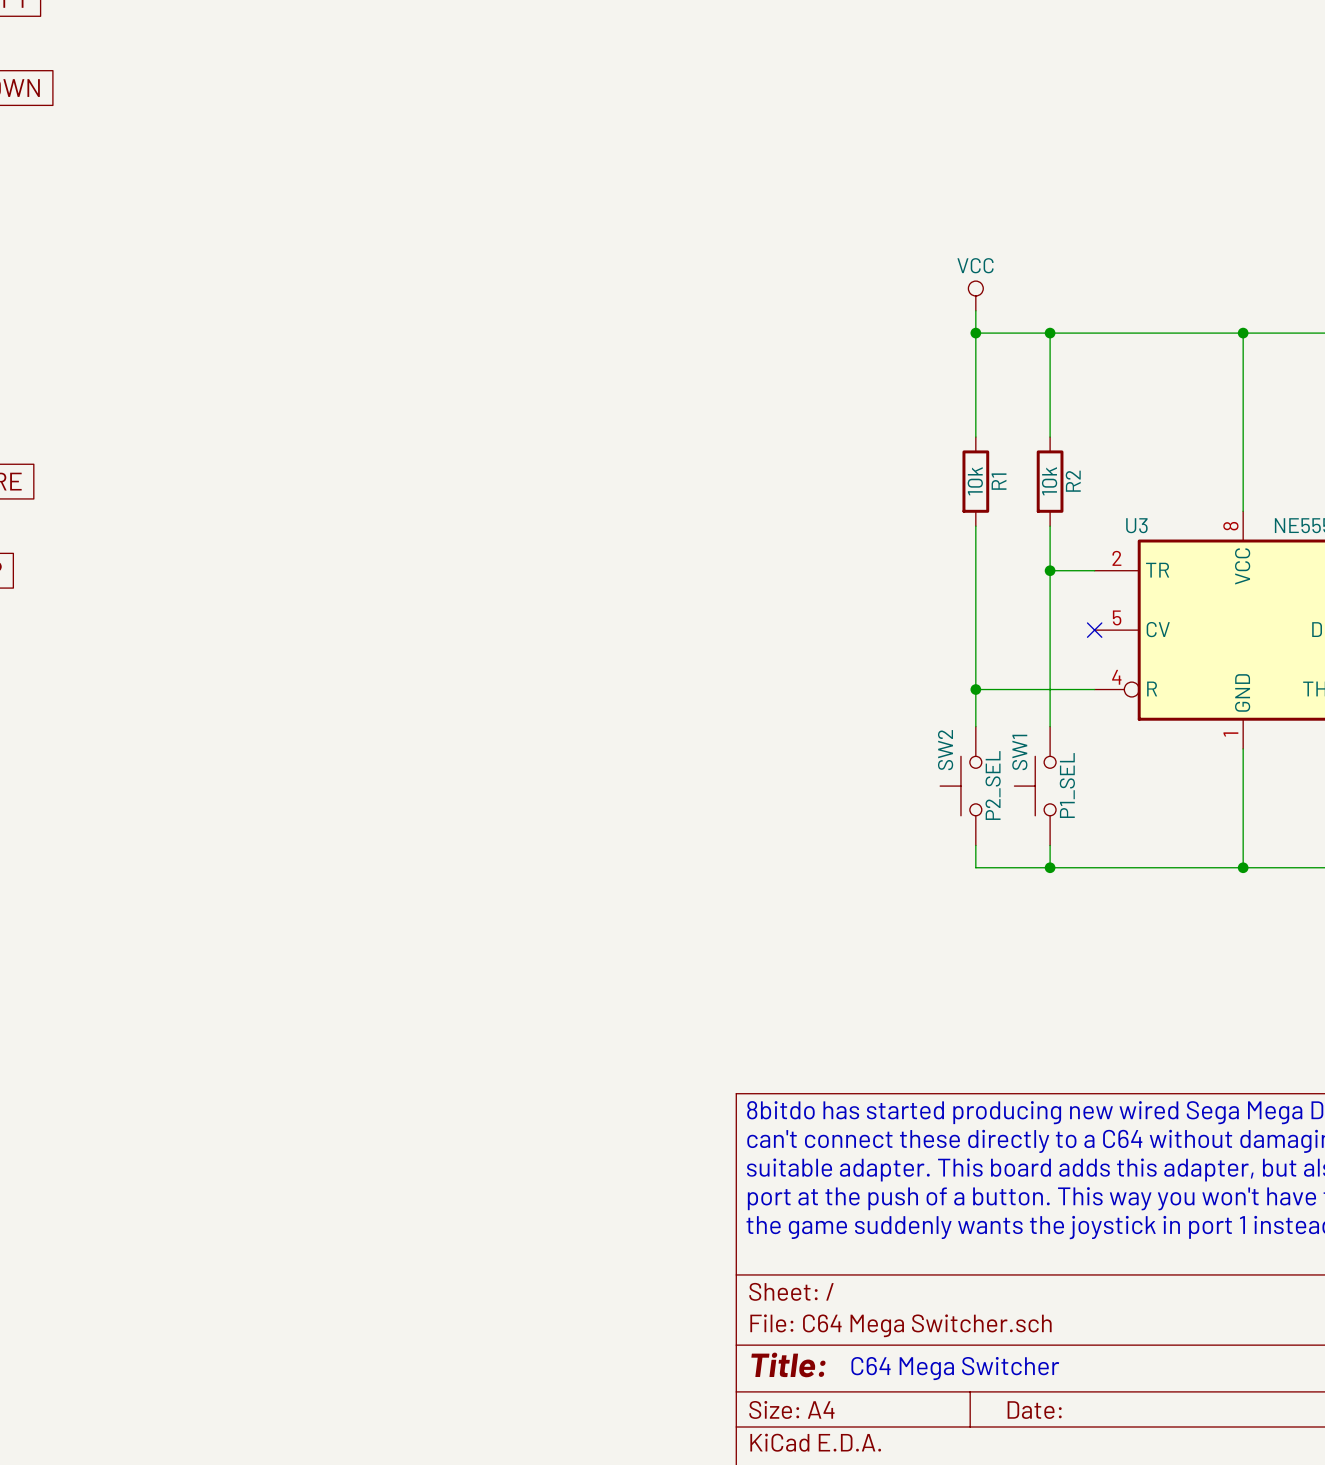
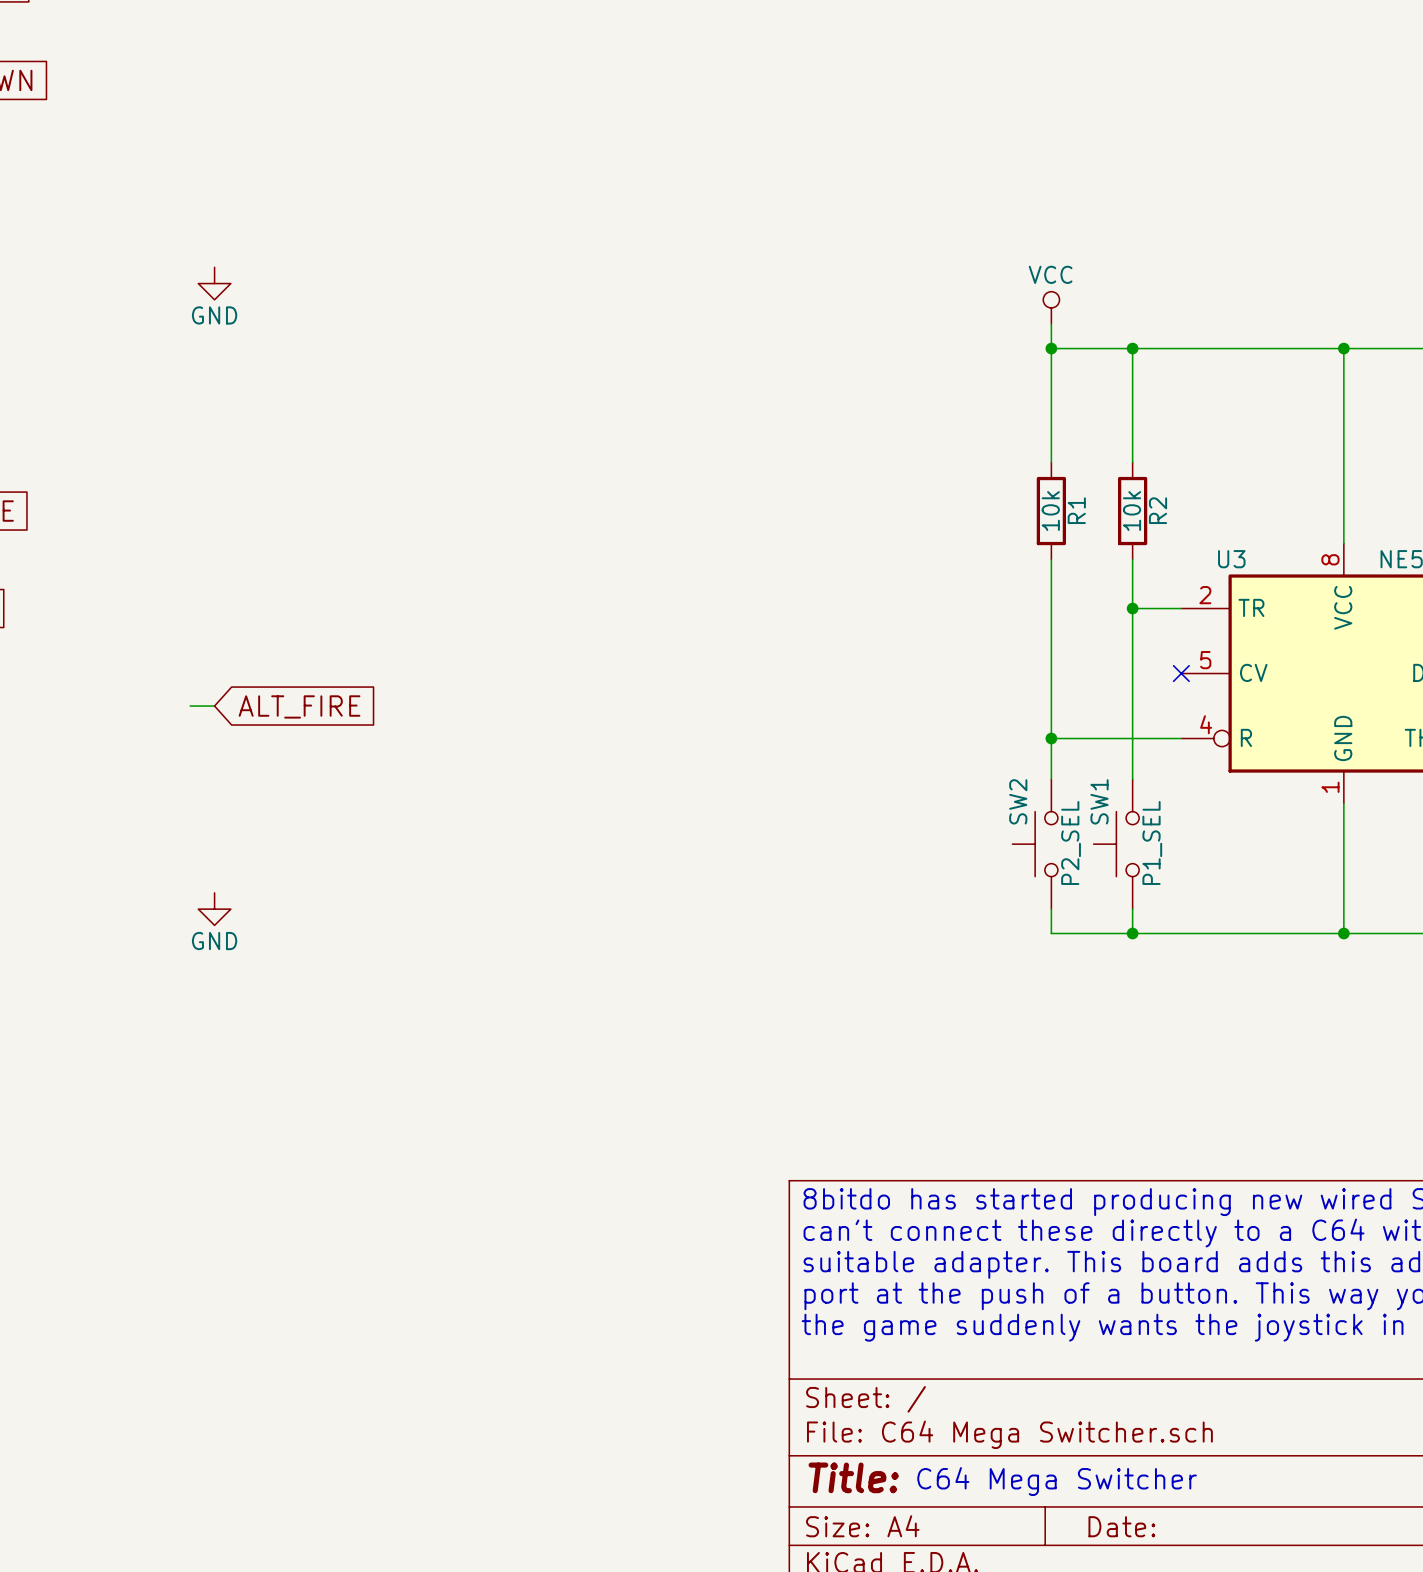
power symbol: none -> GND (214, 283)
wire: none -> (190, 706) (214, 706)
global label: none -> ALT_FIRE (299, 706)
power symbol: none -> GND (214, 909)

